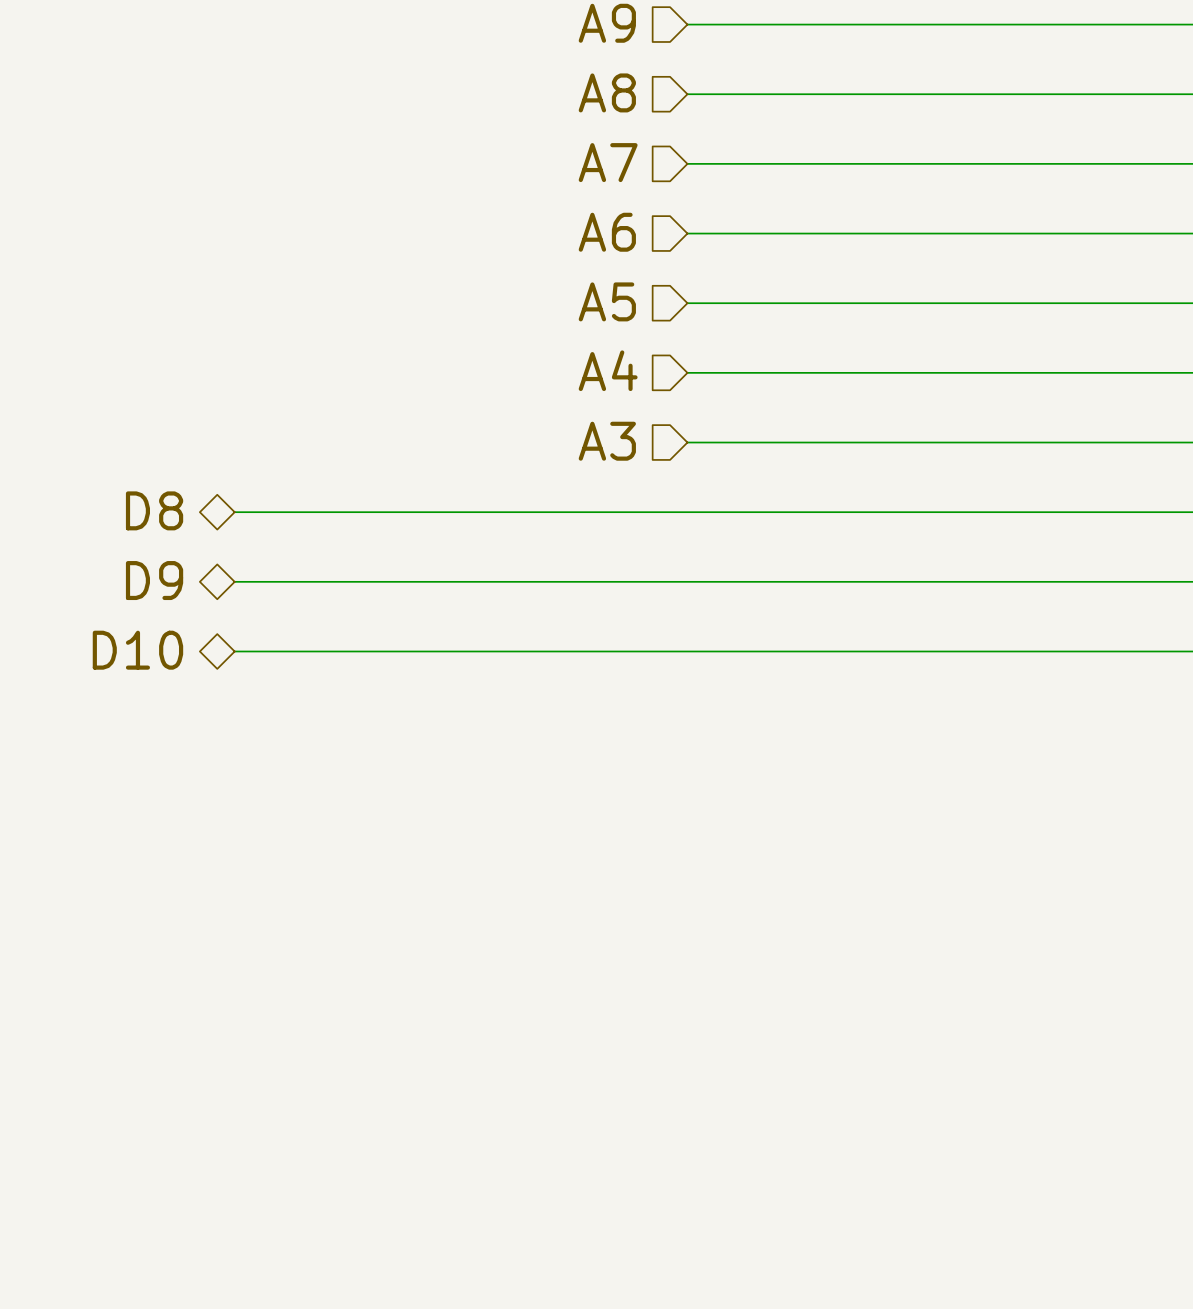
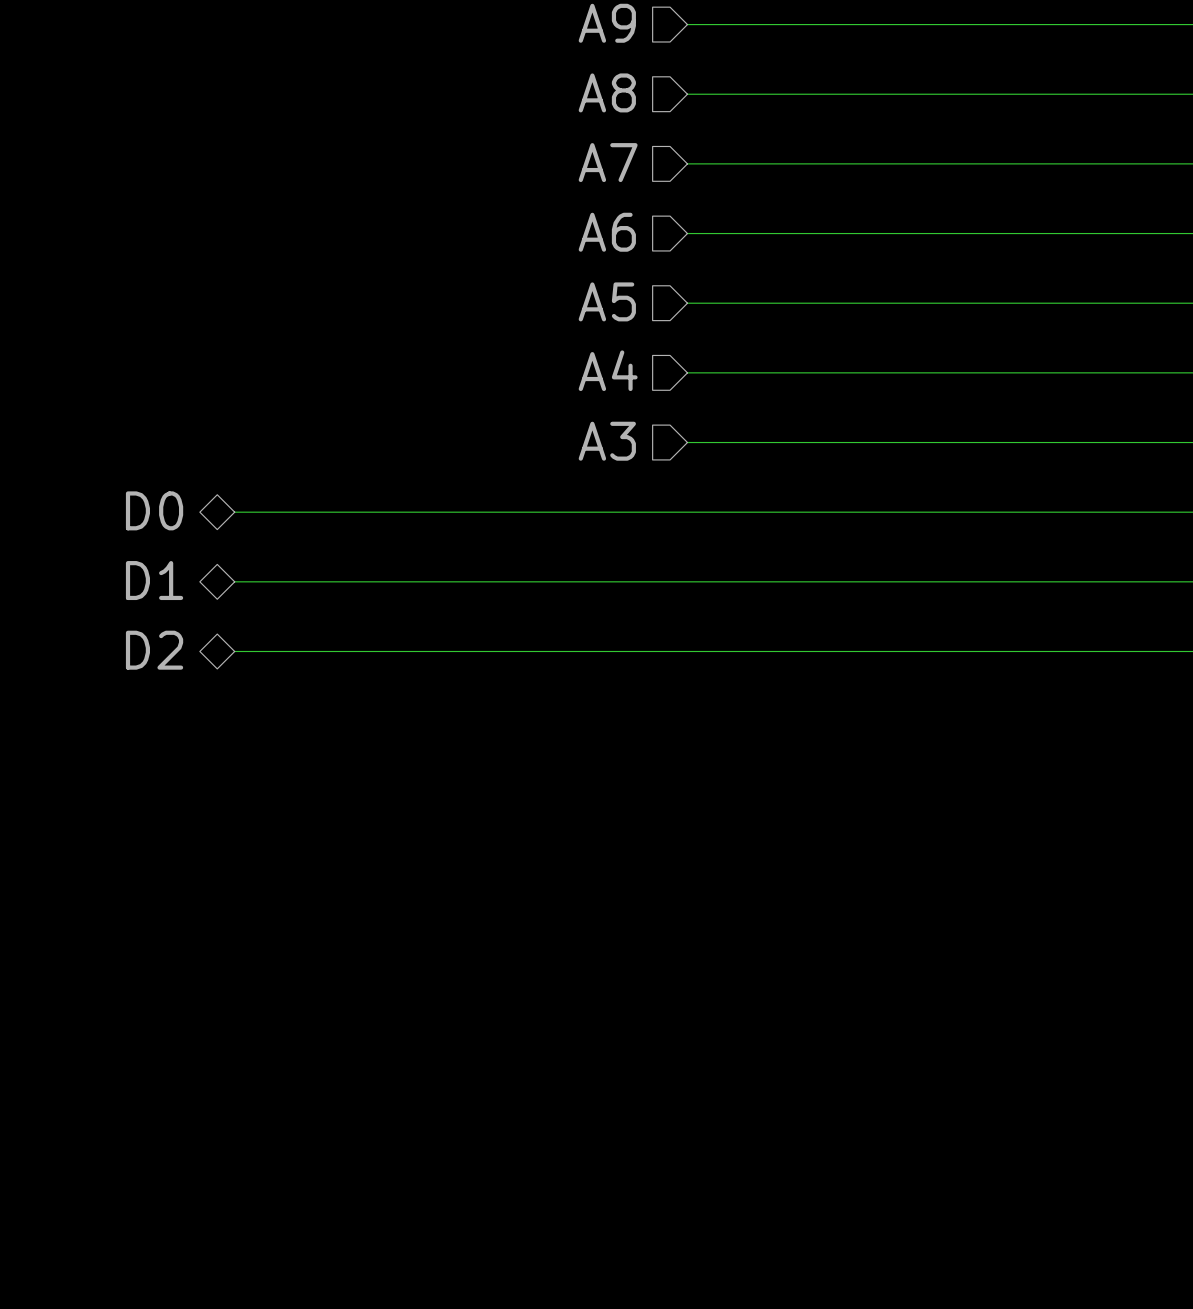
hierarchical label: D8 (154, 510) -> D0 (154, 510)
hierarchical label: D9 (154, 580) -> D1 (154, 580)
hierarchical label: D10 (137, 650) -> D2 (154, 650)

